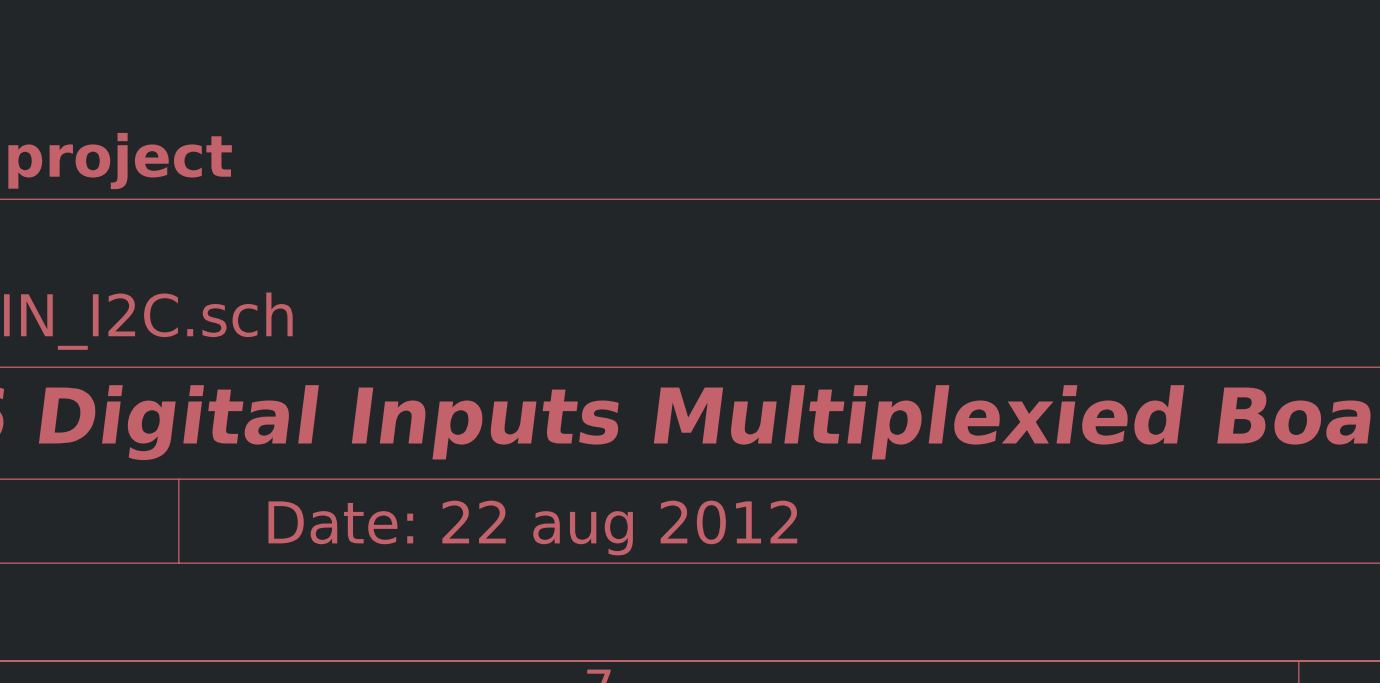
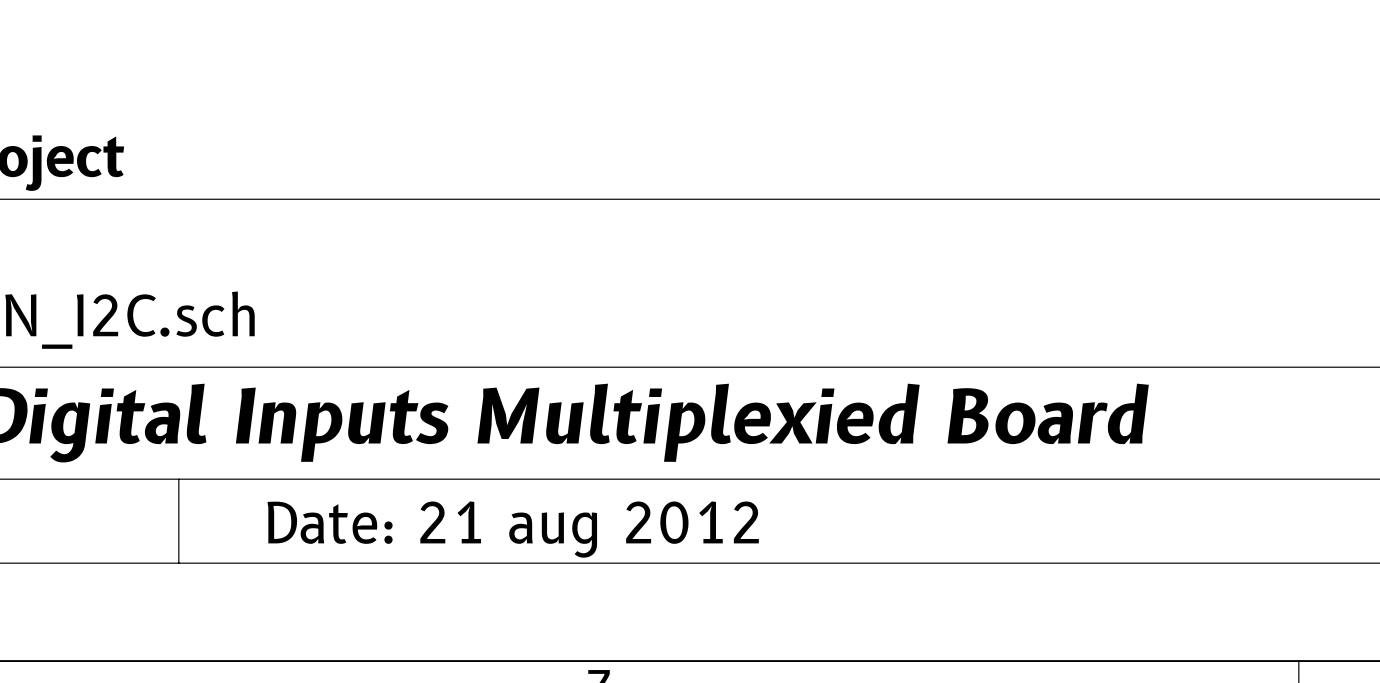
title block: Date: 22 aug 2012 (532, 528) -> Date: 21 aug 2012 (513, 529)

